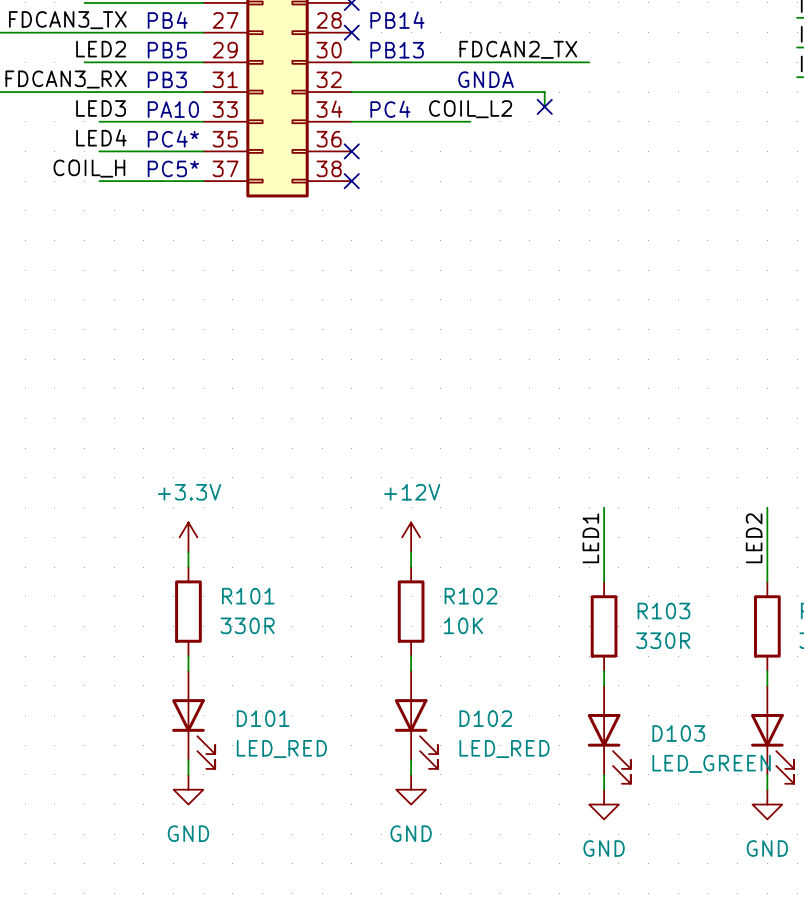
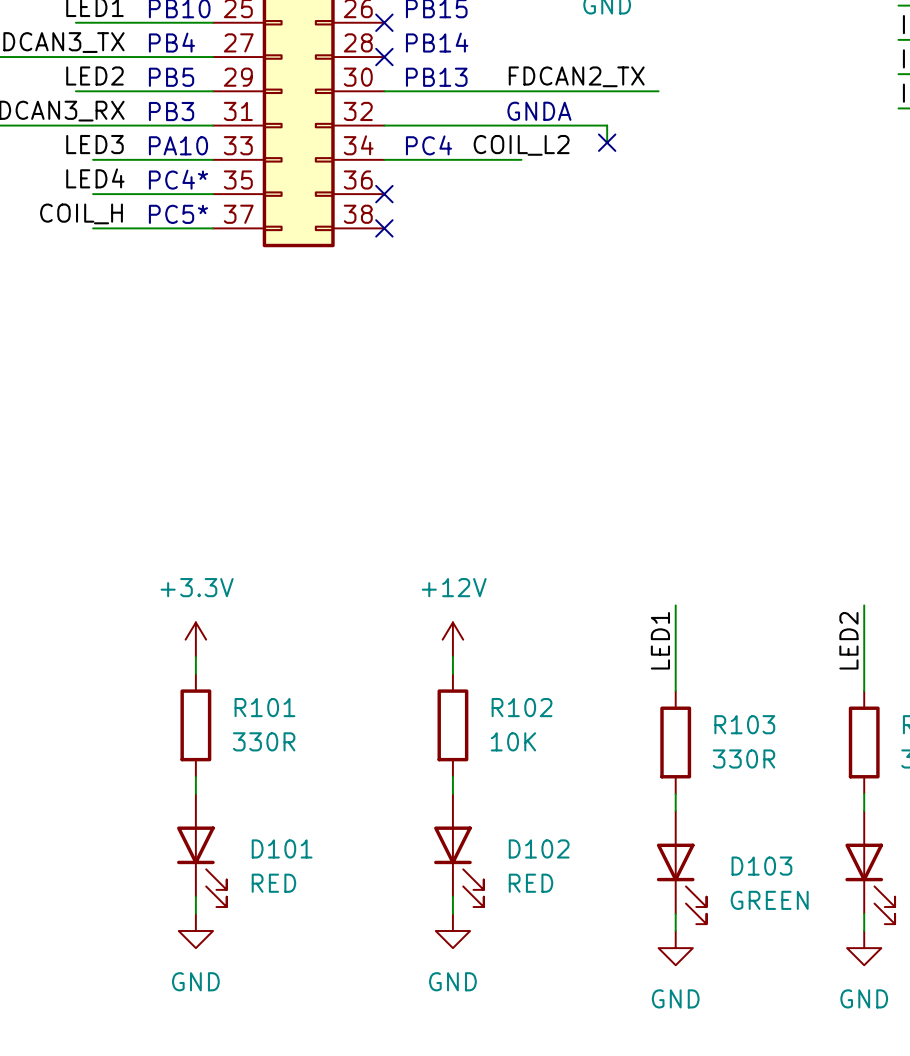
D101 value: LED_RED (281, 749) -> RED (273, 883)
D102 value: LED_RED (504, 749) -> RED (530, 883)
D103 value: LED_GREEN (711, 763) -> GREEN (769, 900)

